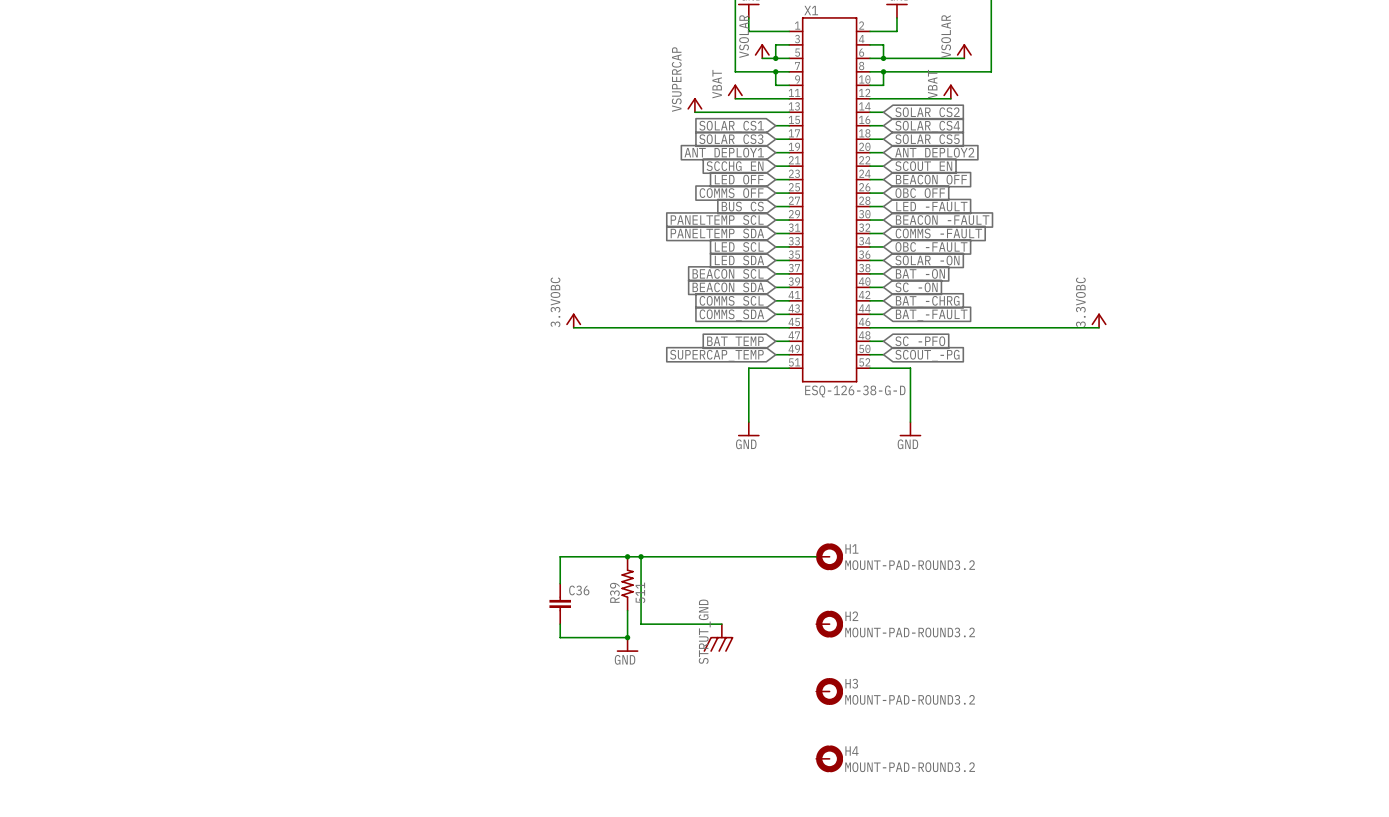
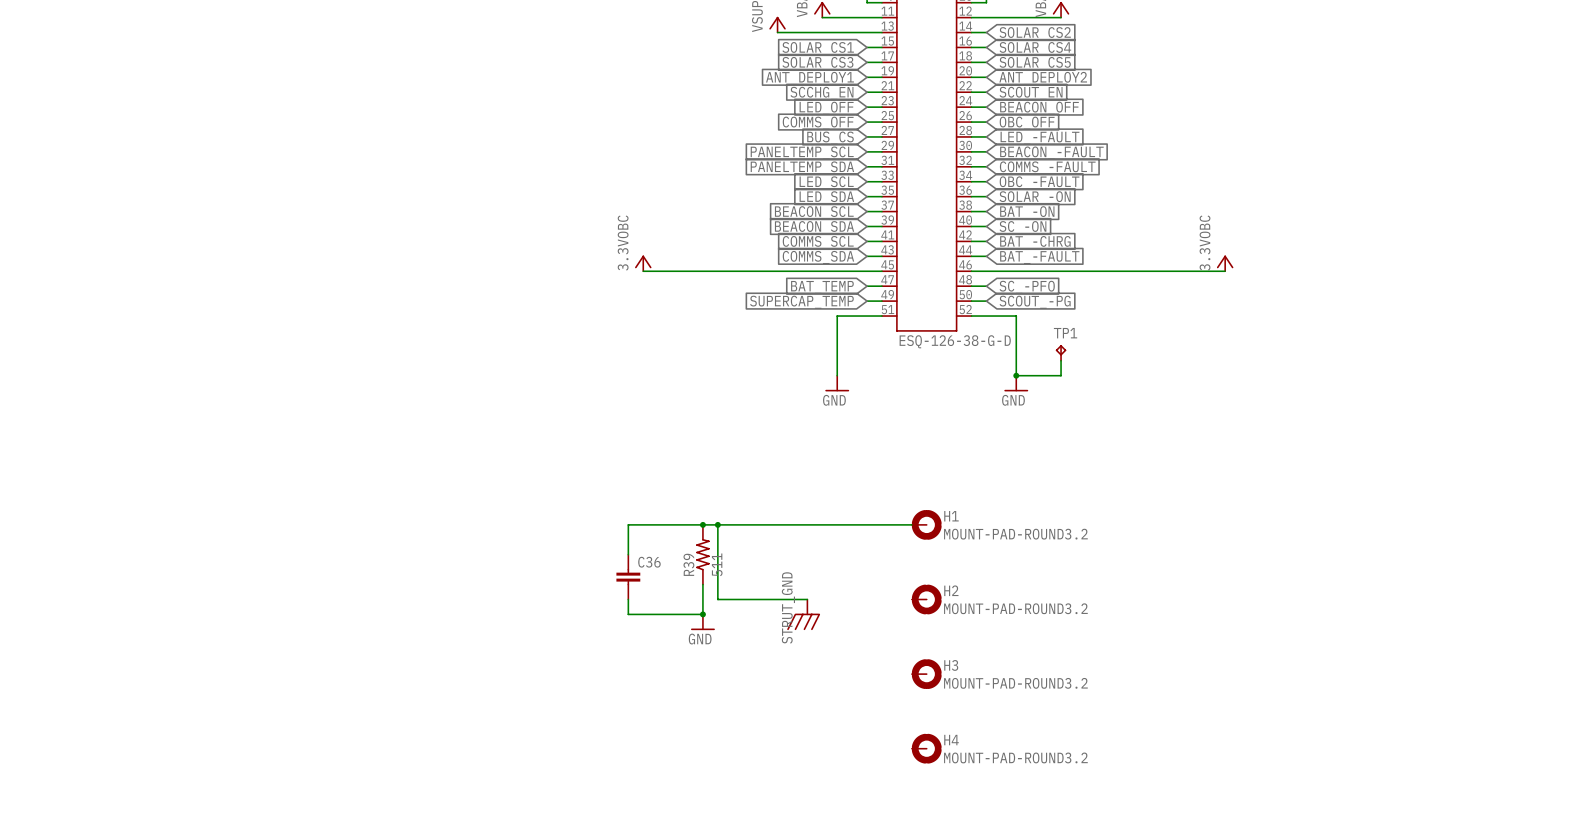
TP1: none -> (1061, 352)
wire: none -> (1061, 360) (1061, 375) (1016, 375)
junction: none -> (1016, 375)

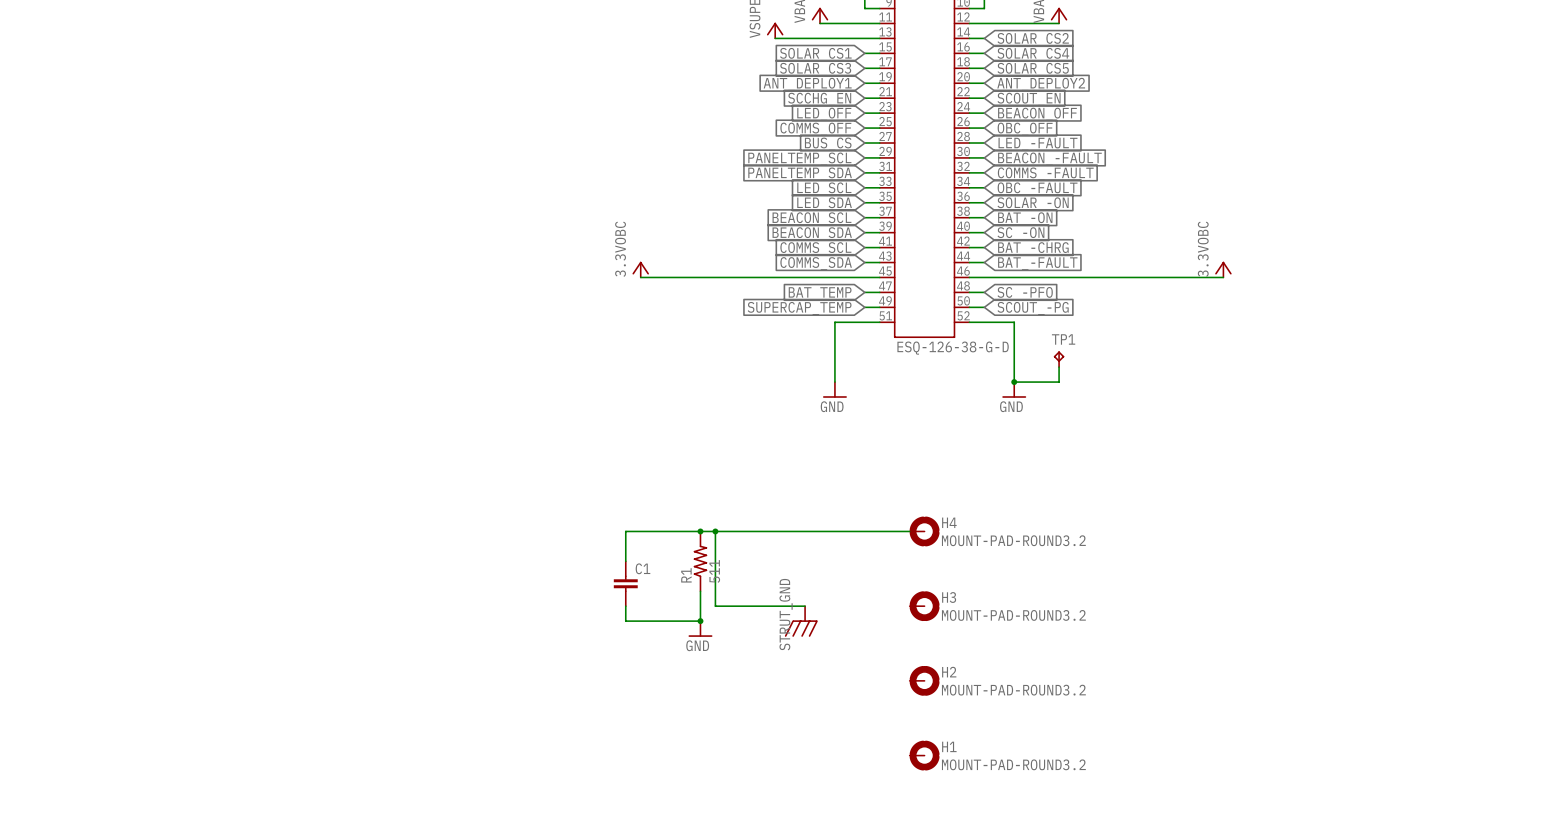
H1 name: H1 (951, 516) -> H4 (949, 522)
C36 name: C36 (649, 562) -> C1 (642, 568)
R39 name: R39 (688, 564) -> R1 (686, 575)
H2 name: H2 (951, 590) -> H3 (949, 597)
H3 name: H3 (951, 665) -> H2 (949, 672)
H4 name: H4 (951, 740) -> H1 (949, 746)

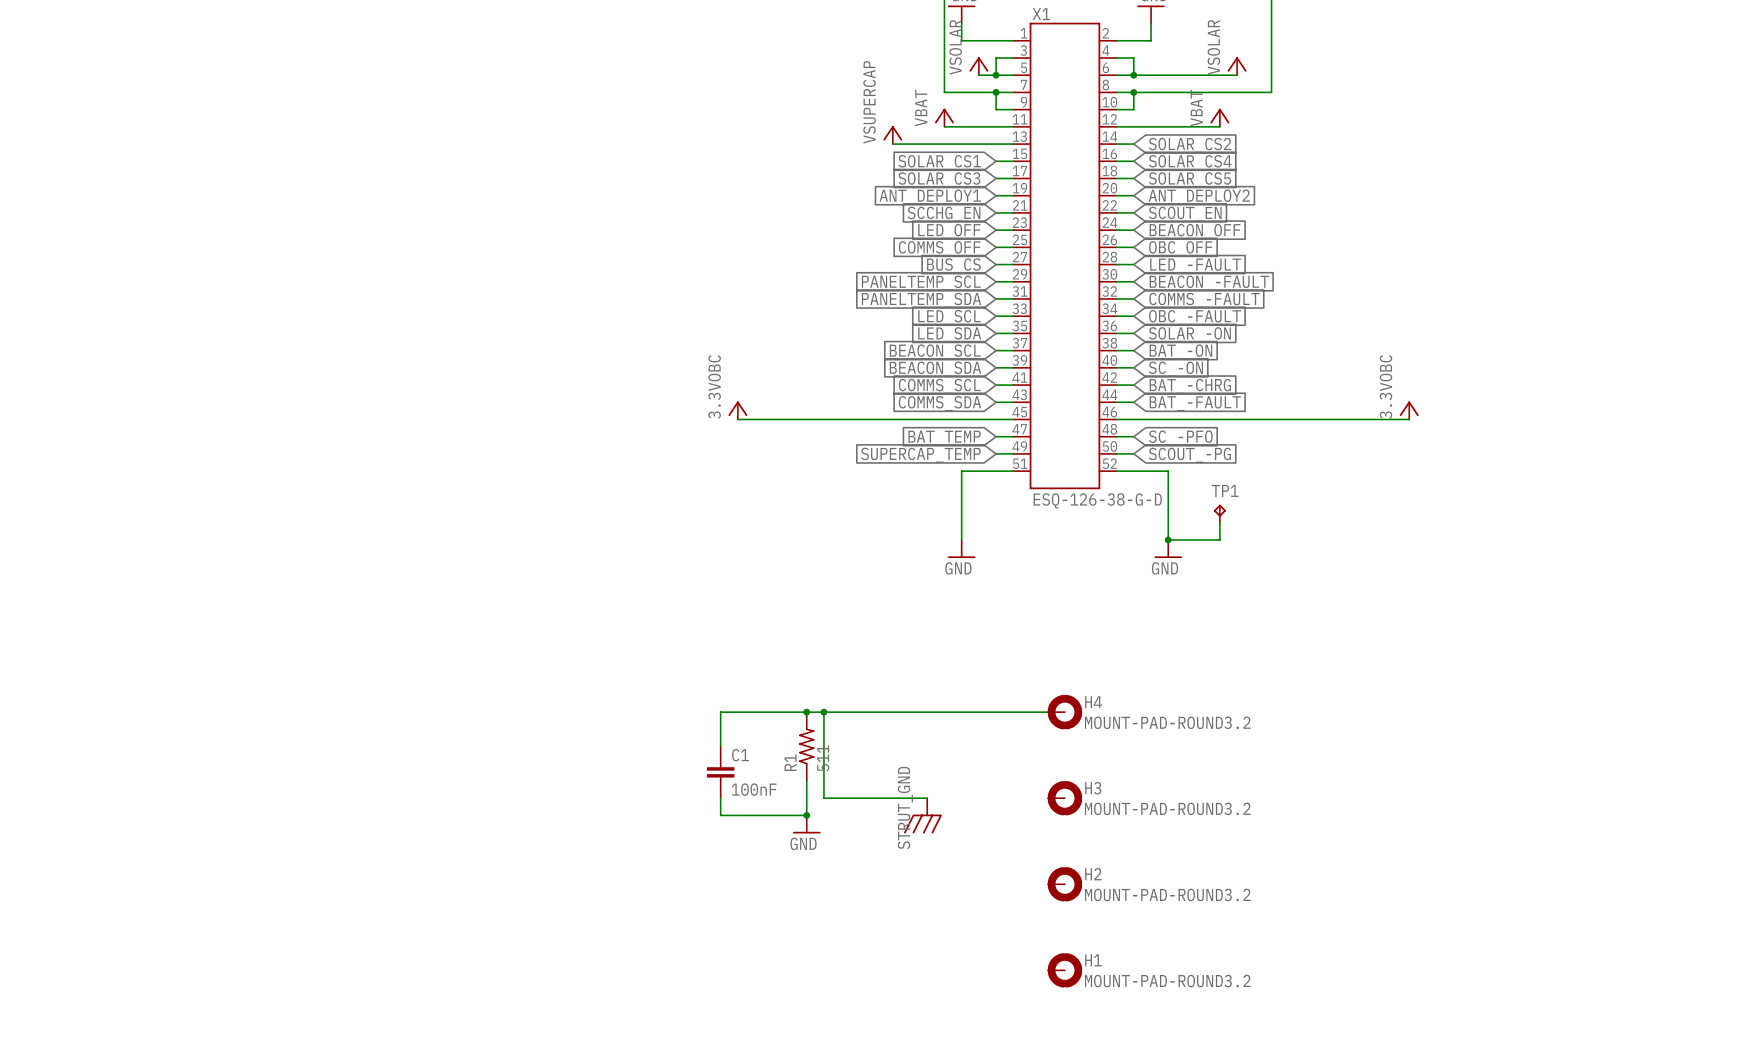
C1 value: none -> 100nF (754, 789)

